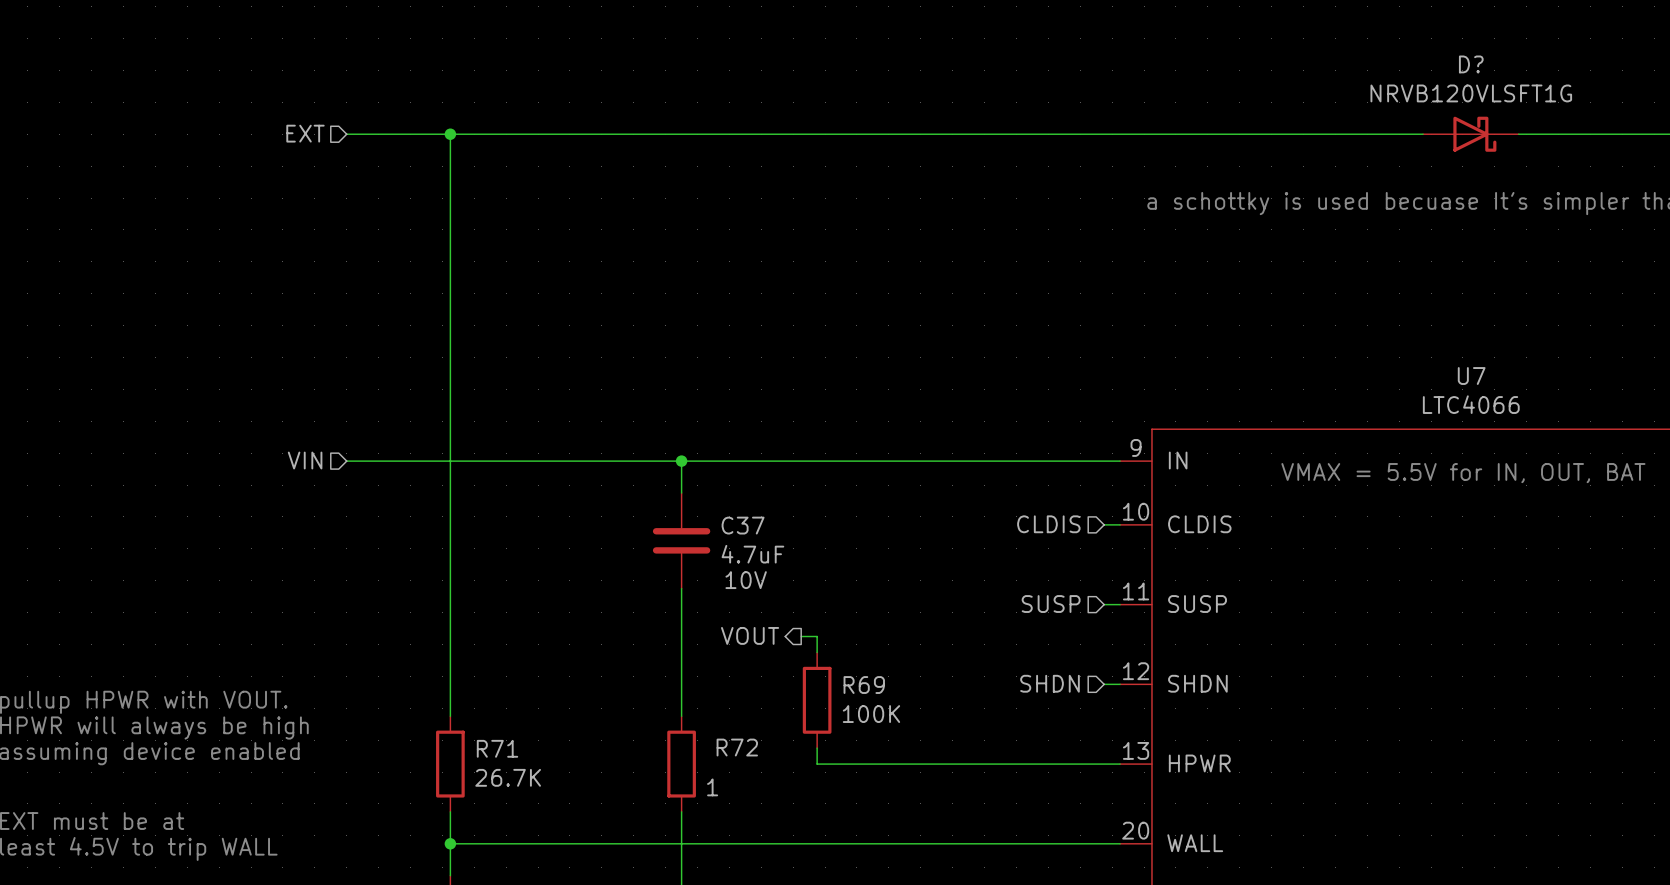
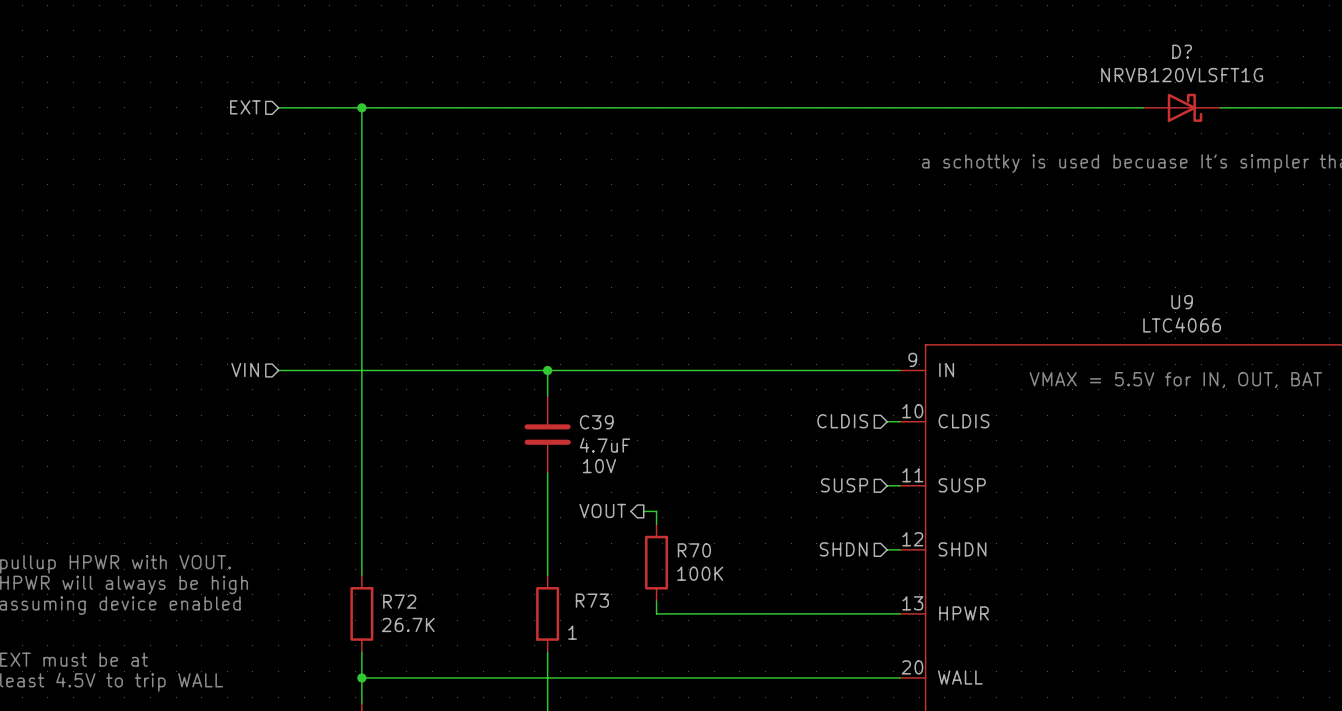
U7 name: U7 (1471, 376) -> U9 (1182, 302)
C37 name: C37 (743, 525) -> C39 (596, 422)
R69 name: R69 (864, 685) -> R70 (694, 550)
R72 name: R72 (737, 747) -> R73 (592, 600)
R71 name: R71 (497, 748) -> R72 (399, 601)

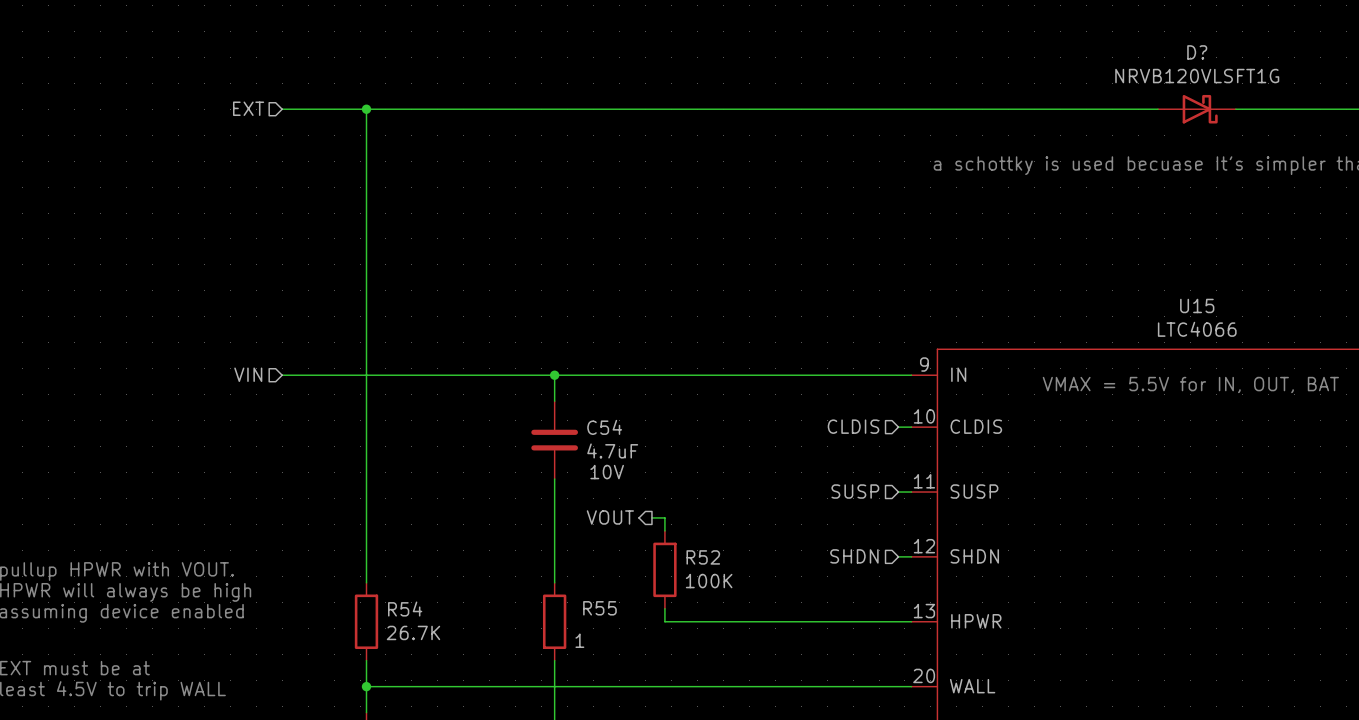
U9 name: U9 (1182, 302) -> U15 (1197, 305)
C39 name: C39 (596, 422) -> C54 (604, 427)
R70 name: R70 (694, 550) -> R52 (703, 557)
R73 name: R73 (592, 600) -> R55 (599, 608)
R72 name: R72 (399, 601) -> R54 (405, 609)

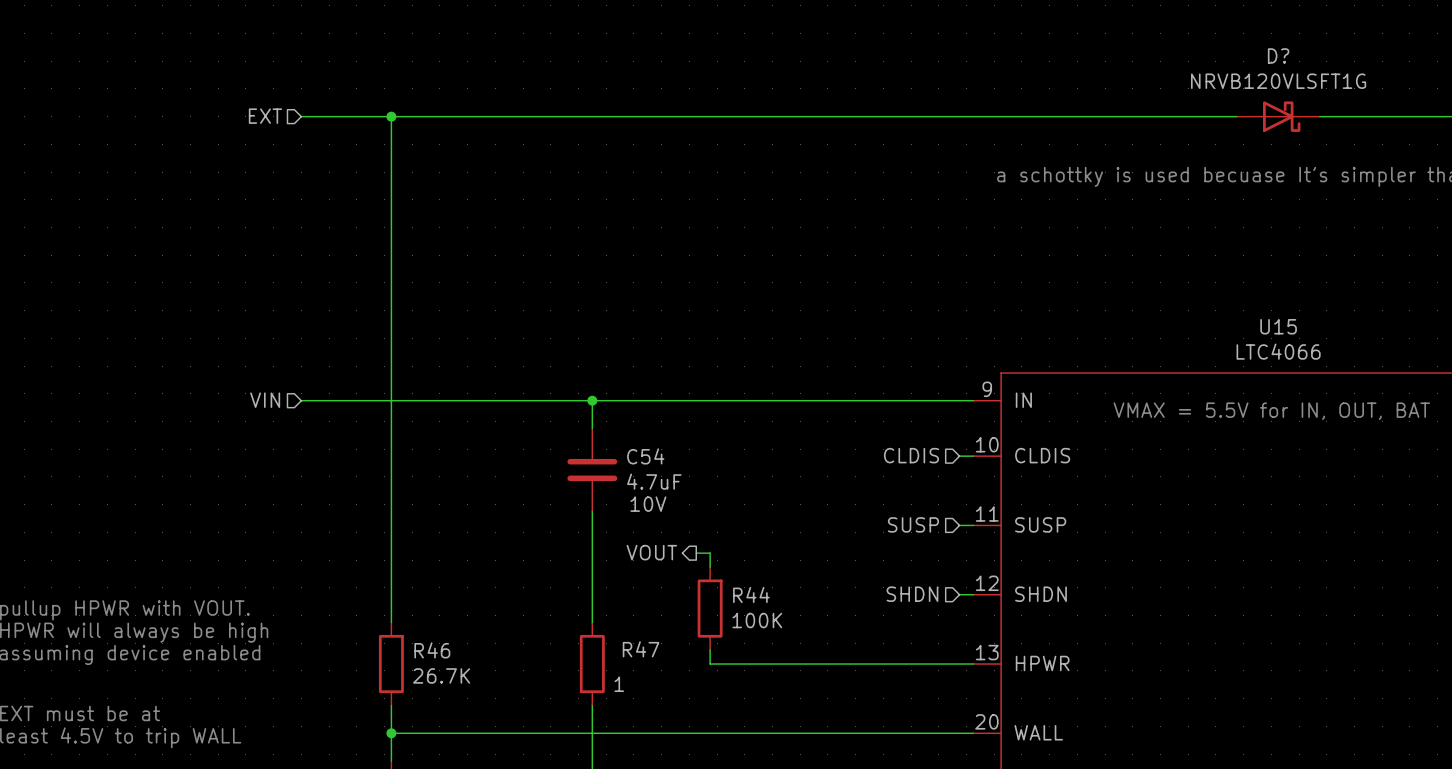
R52 name: R52 (703, 557) -> R44 (751, 594)
R55 name: R55 (599, 608) -> R47 (641, 649)
R54 name: R54 (405, 609) -> R46 (432, 650)

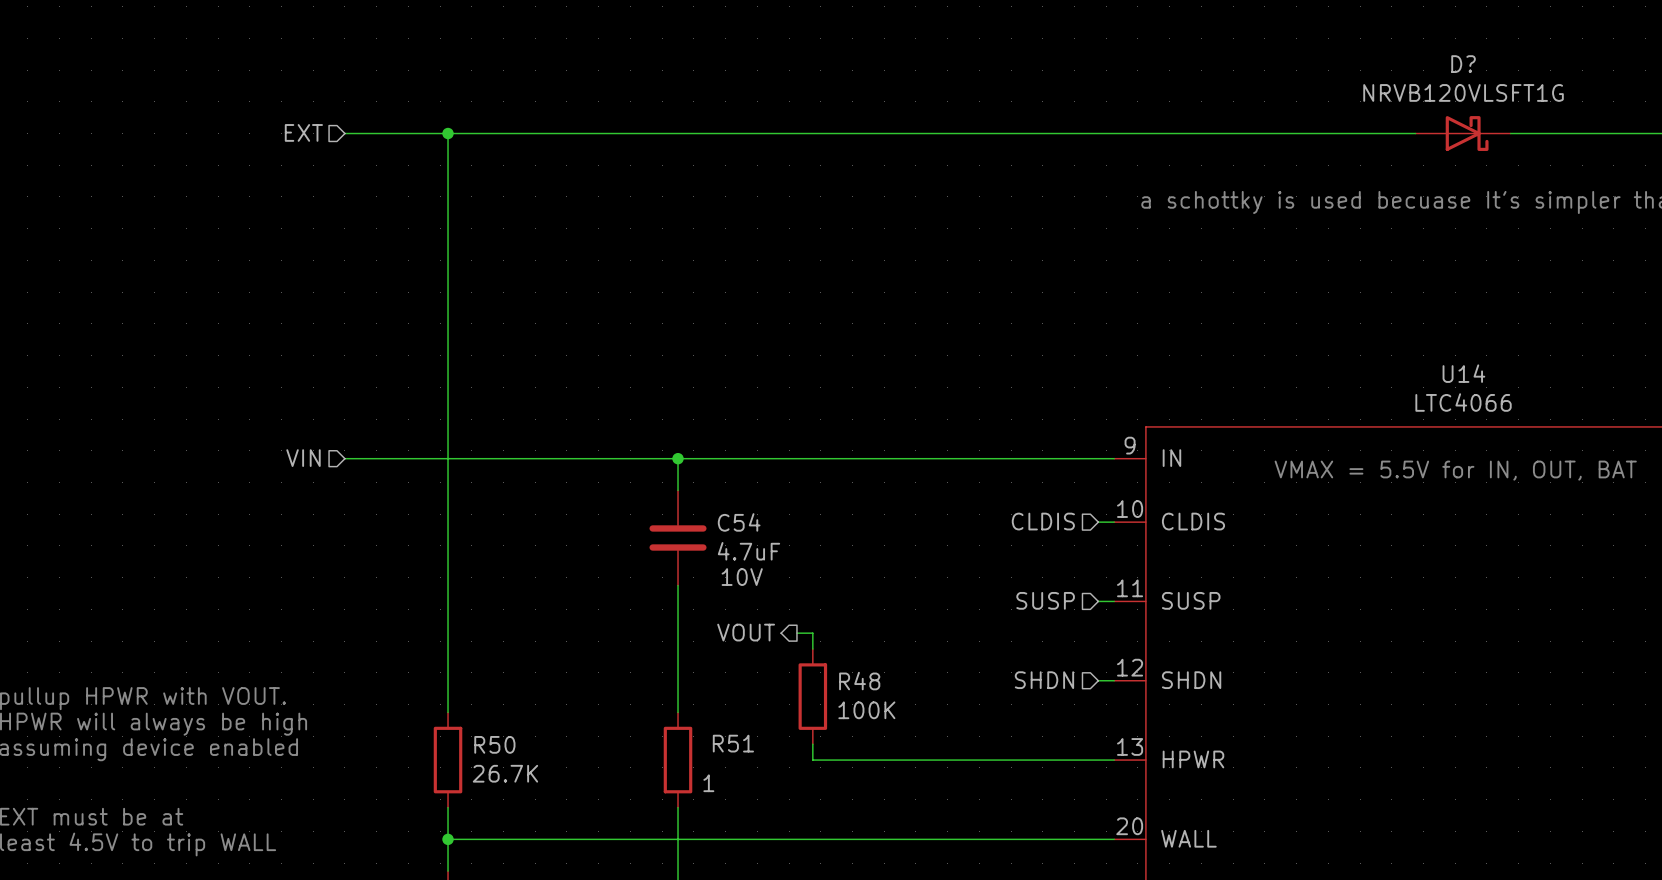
U15 name: U15 (1278, 326) -> U14 (1463, 373)
R44 name: R44 (751, 594) -> R48 (859, 681)
R47 name: R47 (641, 649) -> R51 (733, 743)
R46 name: R46 (432, 650) -> R50 (494, 744)

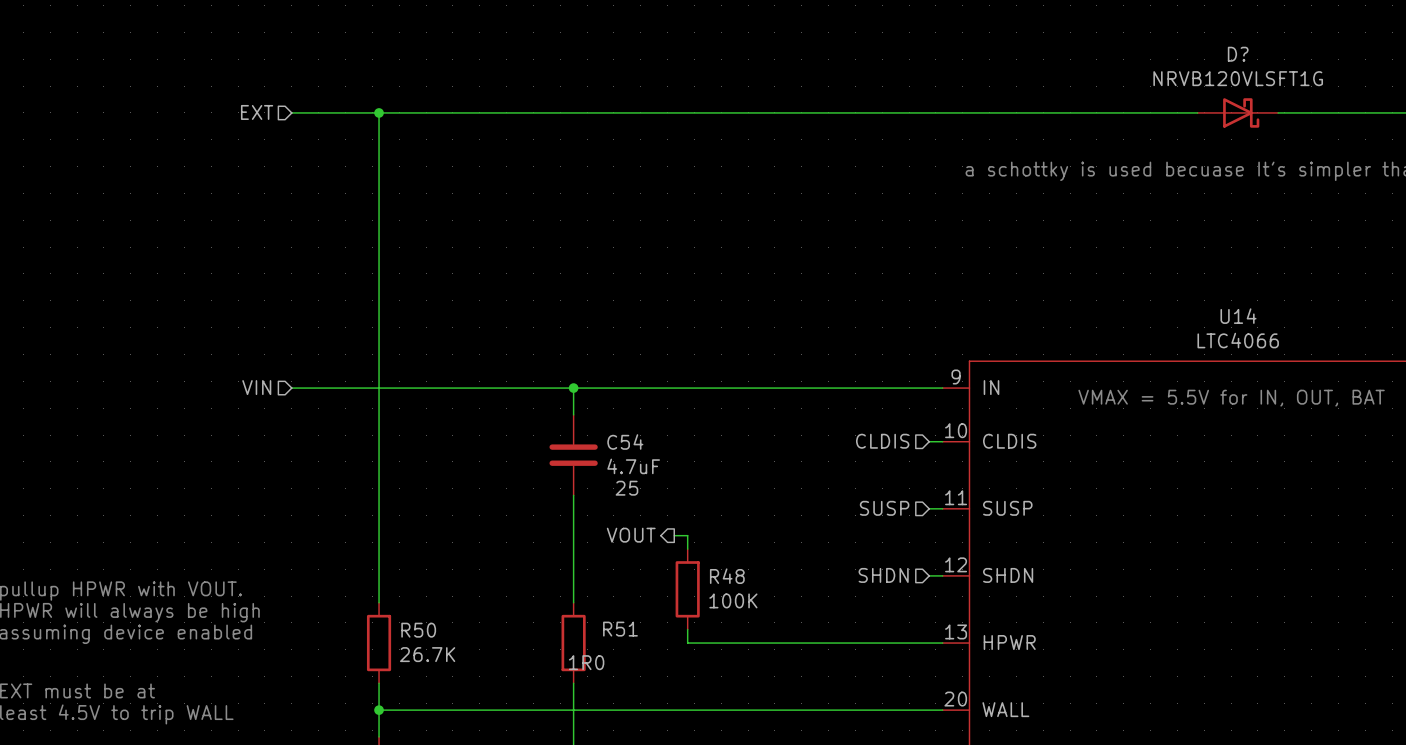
C54 text: 10V (742, 577) -> 25 (626, 488)
R51 value: 1 (708, 783) -> 1R0 (586, 662)

